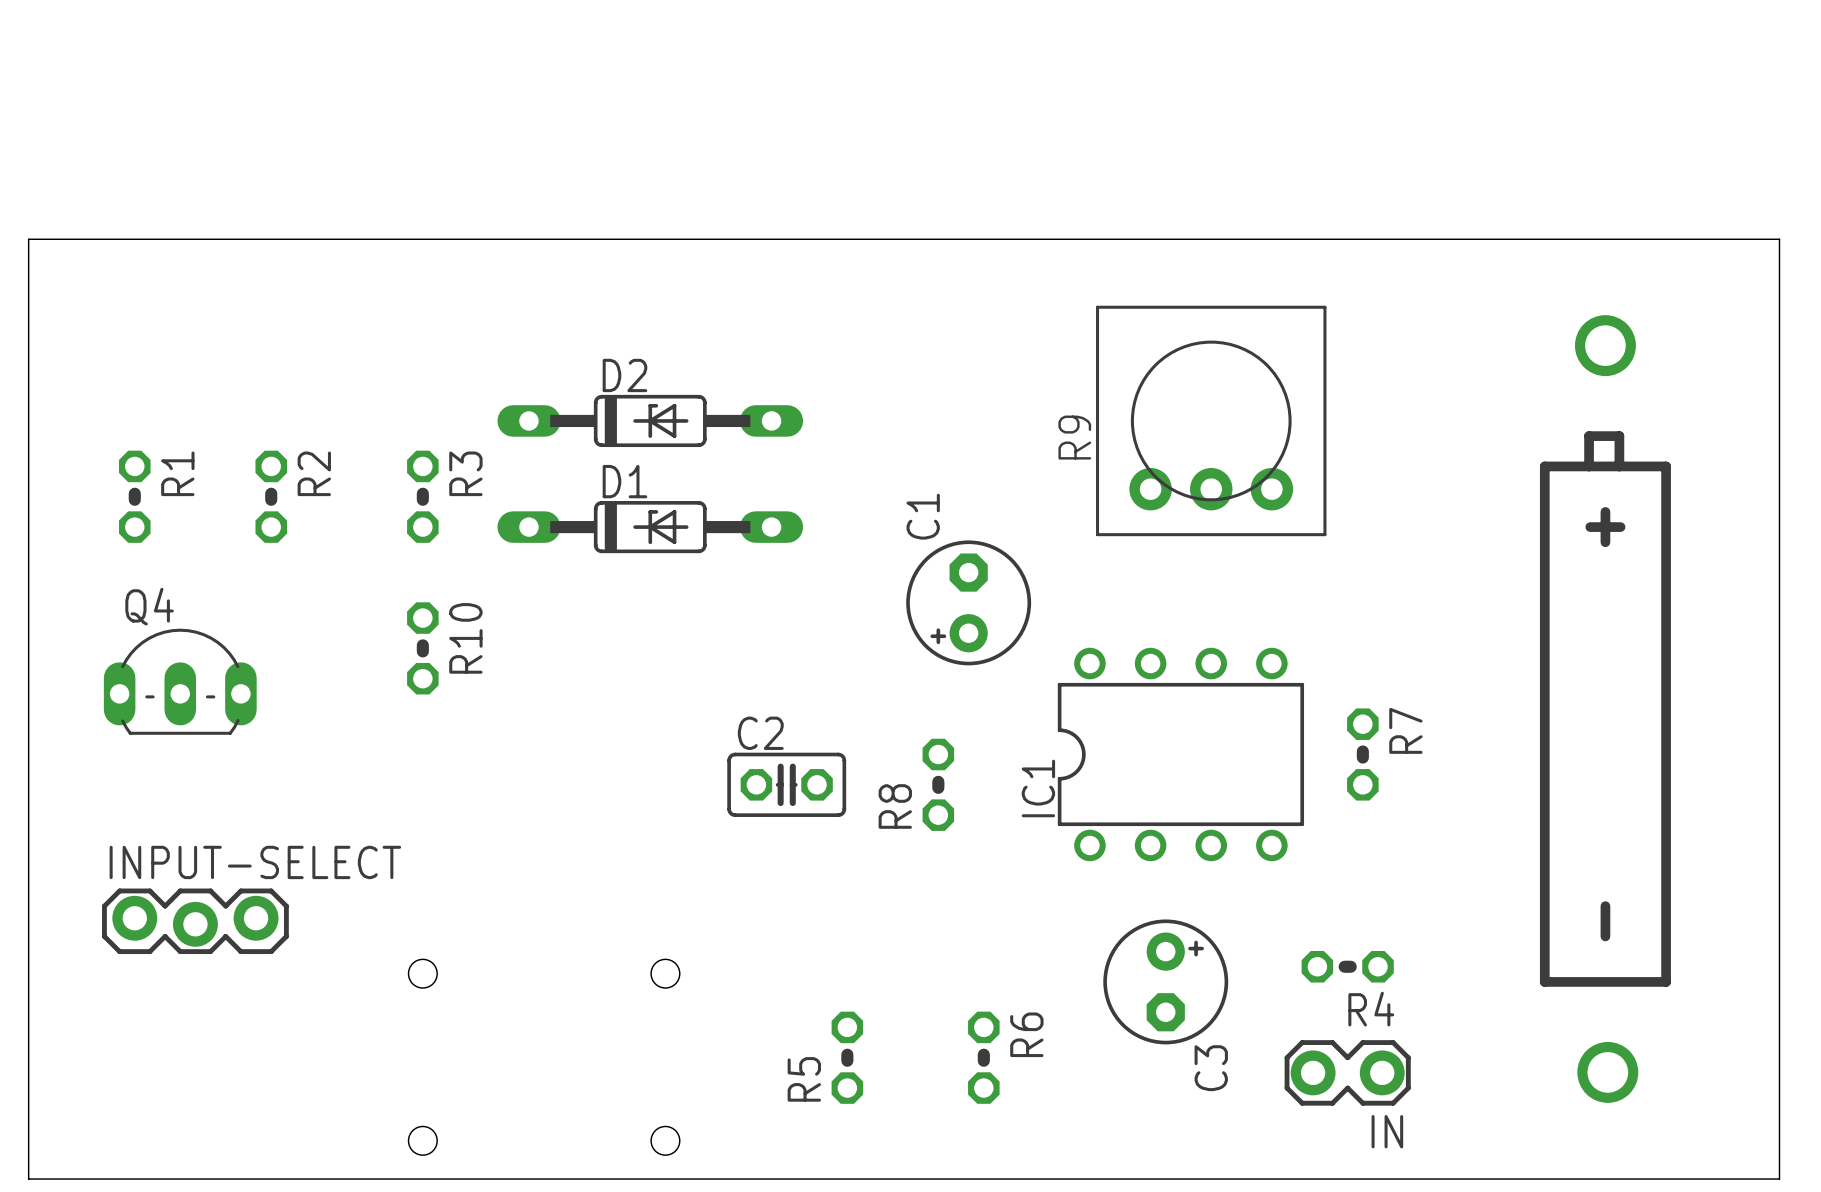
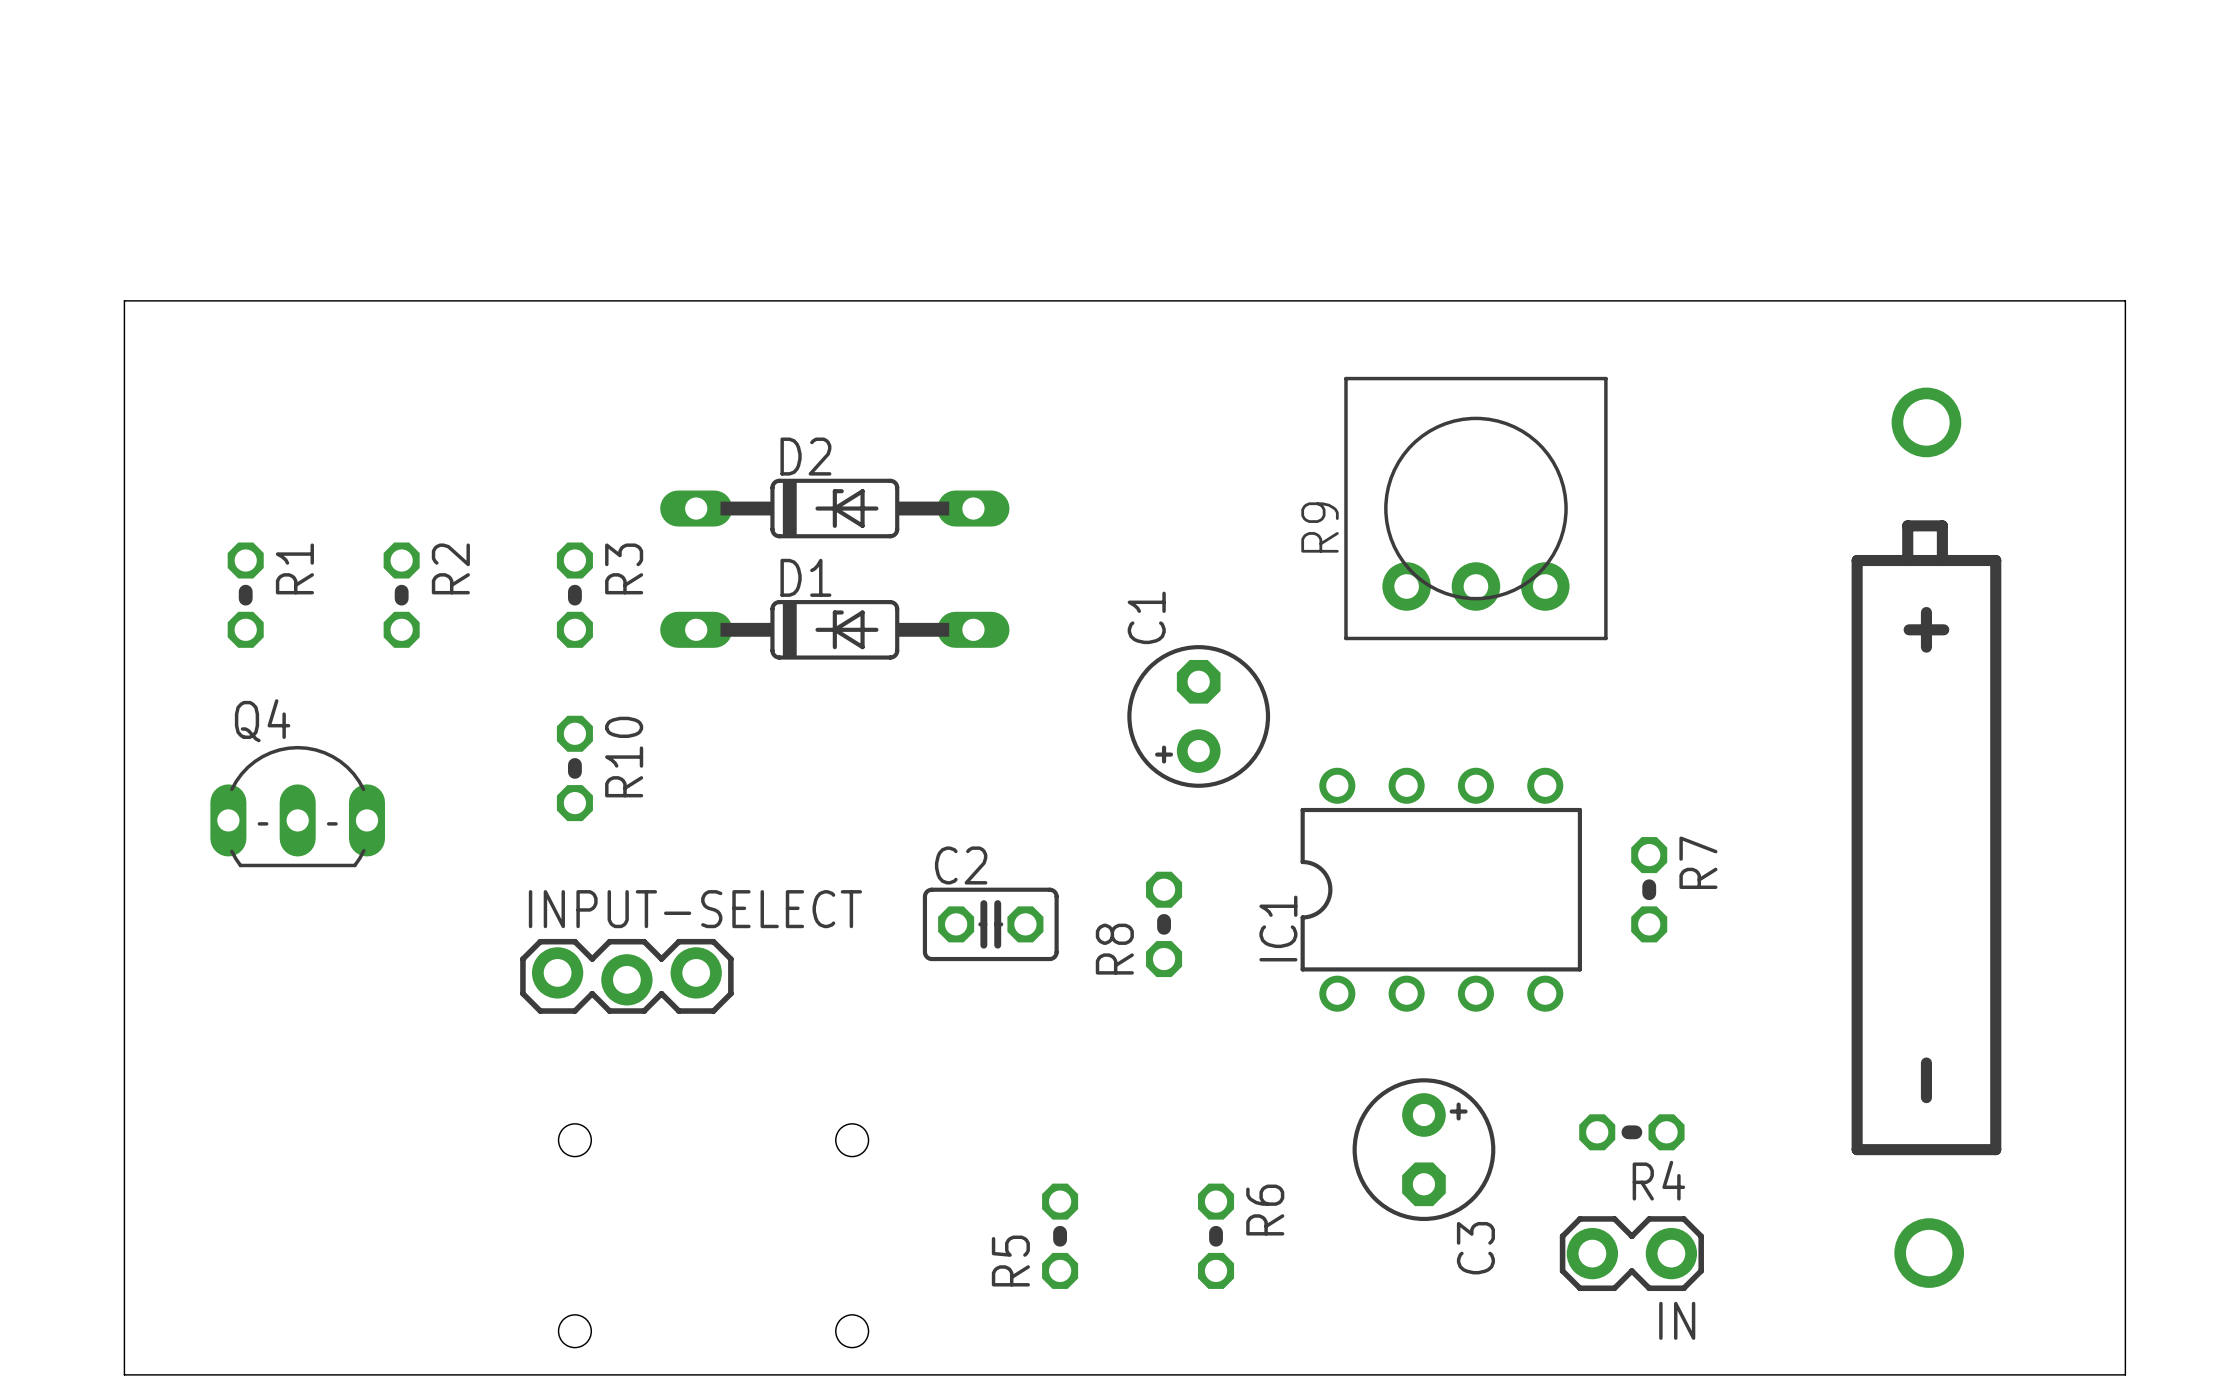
INPUT-SELECT position: (195, 921) -> (626, 976)

